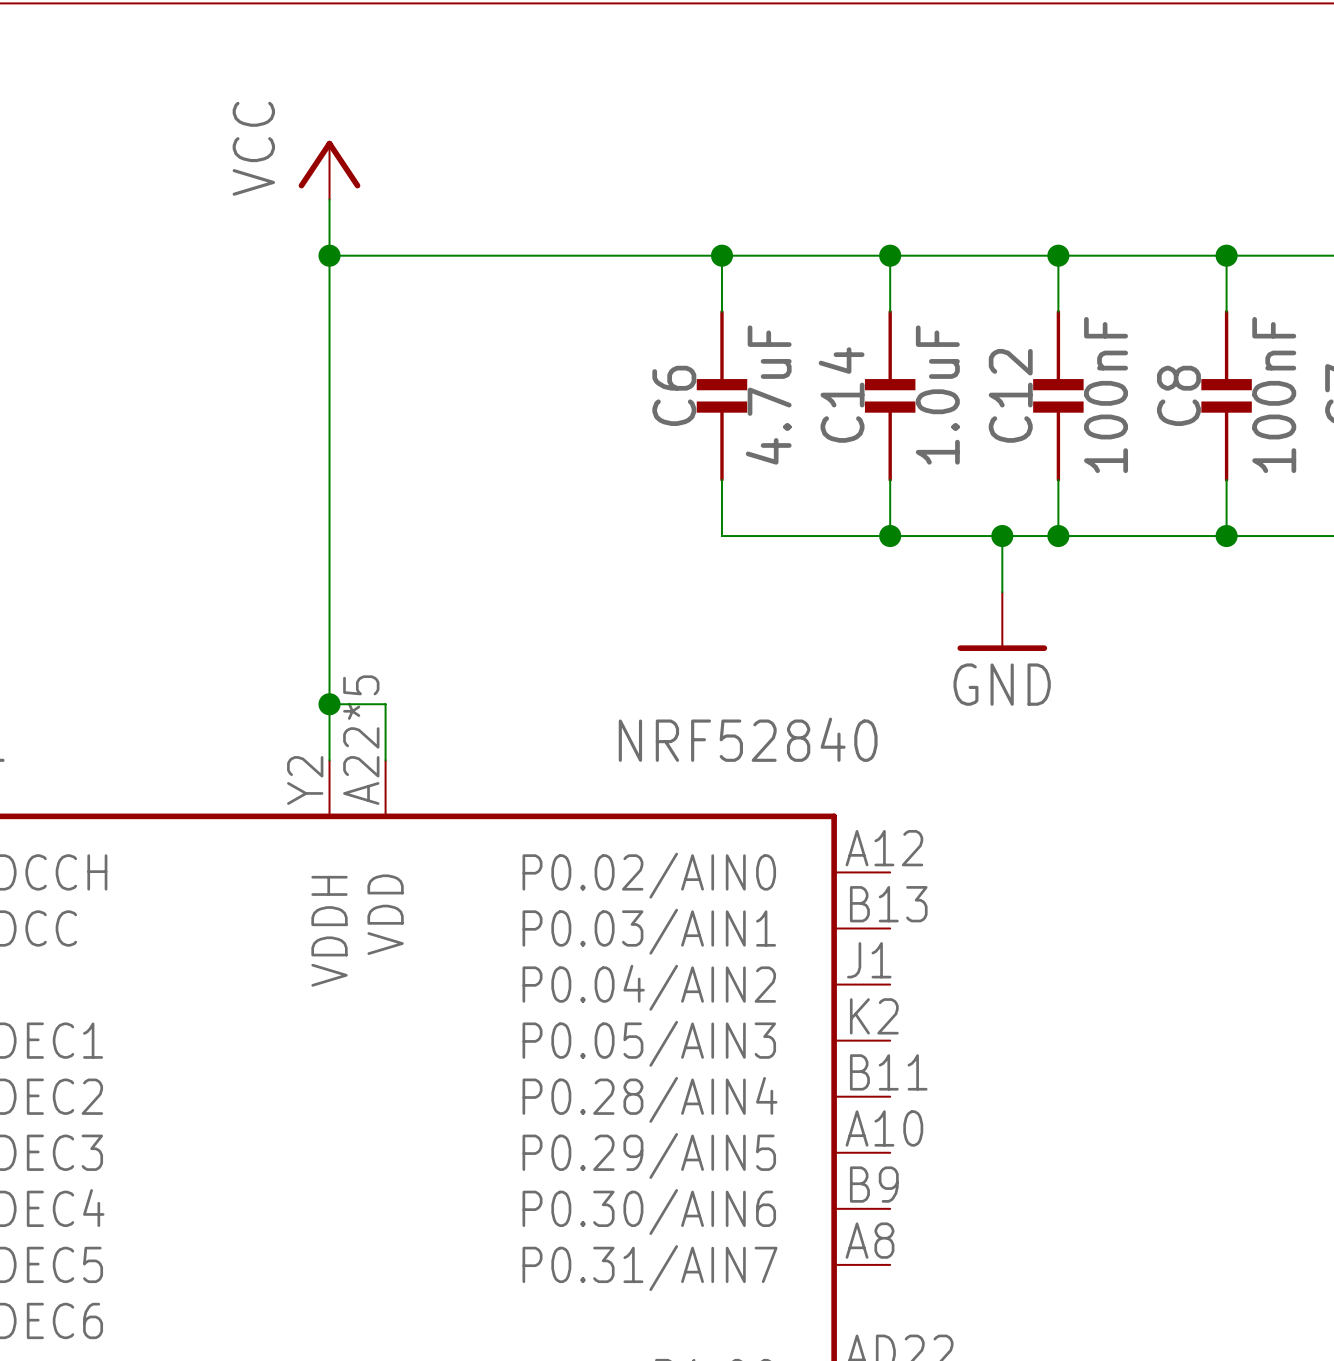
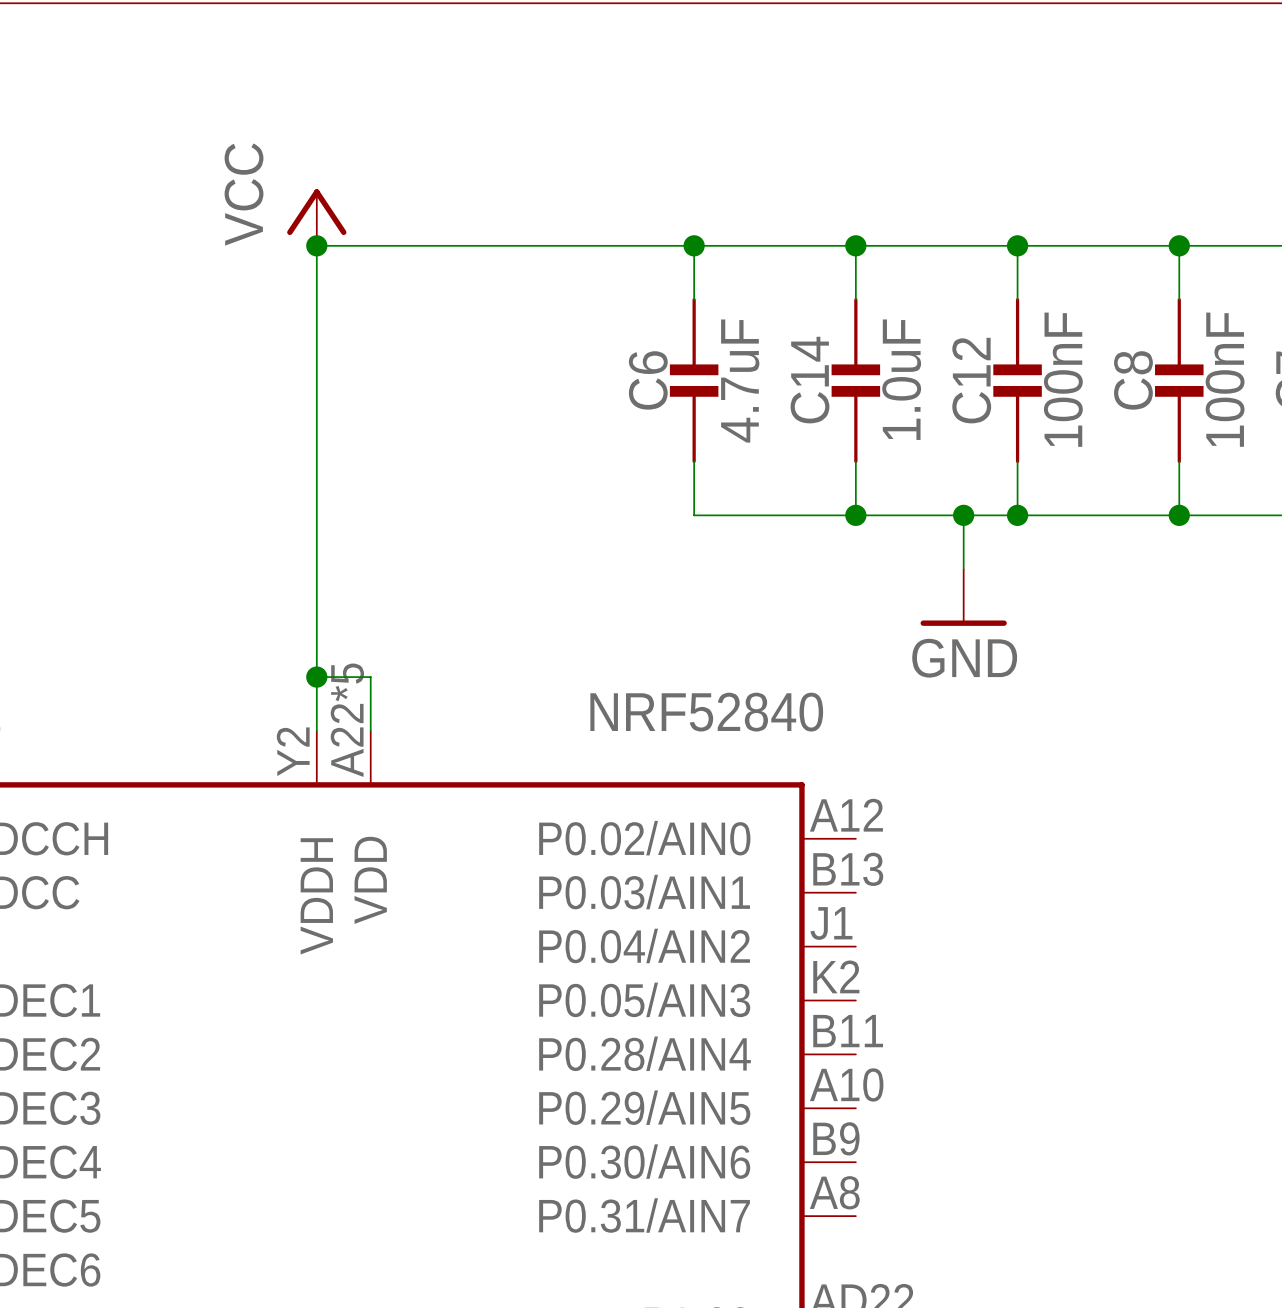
power symbol position: VCC (329, 170) -> VCC (316, 217)

